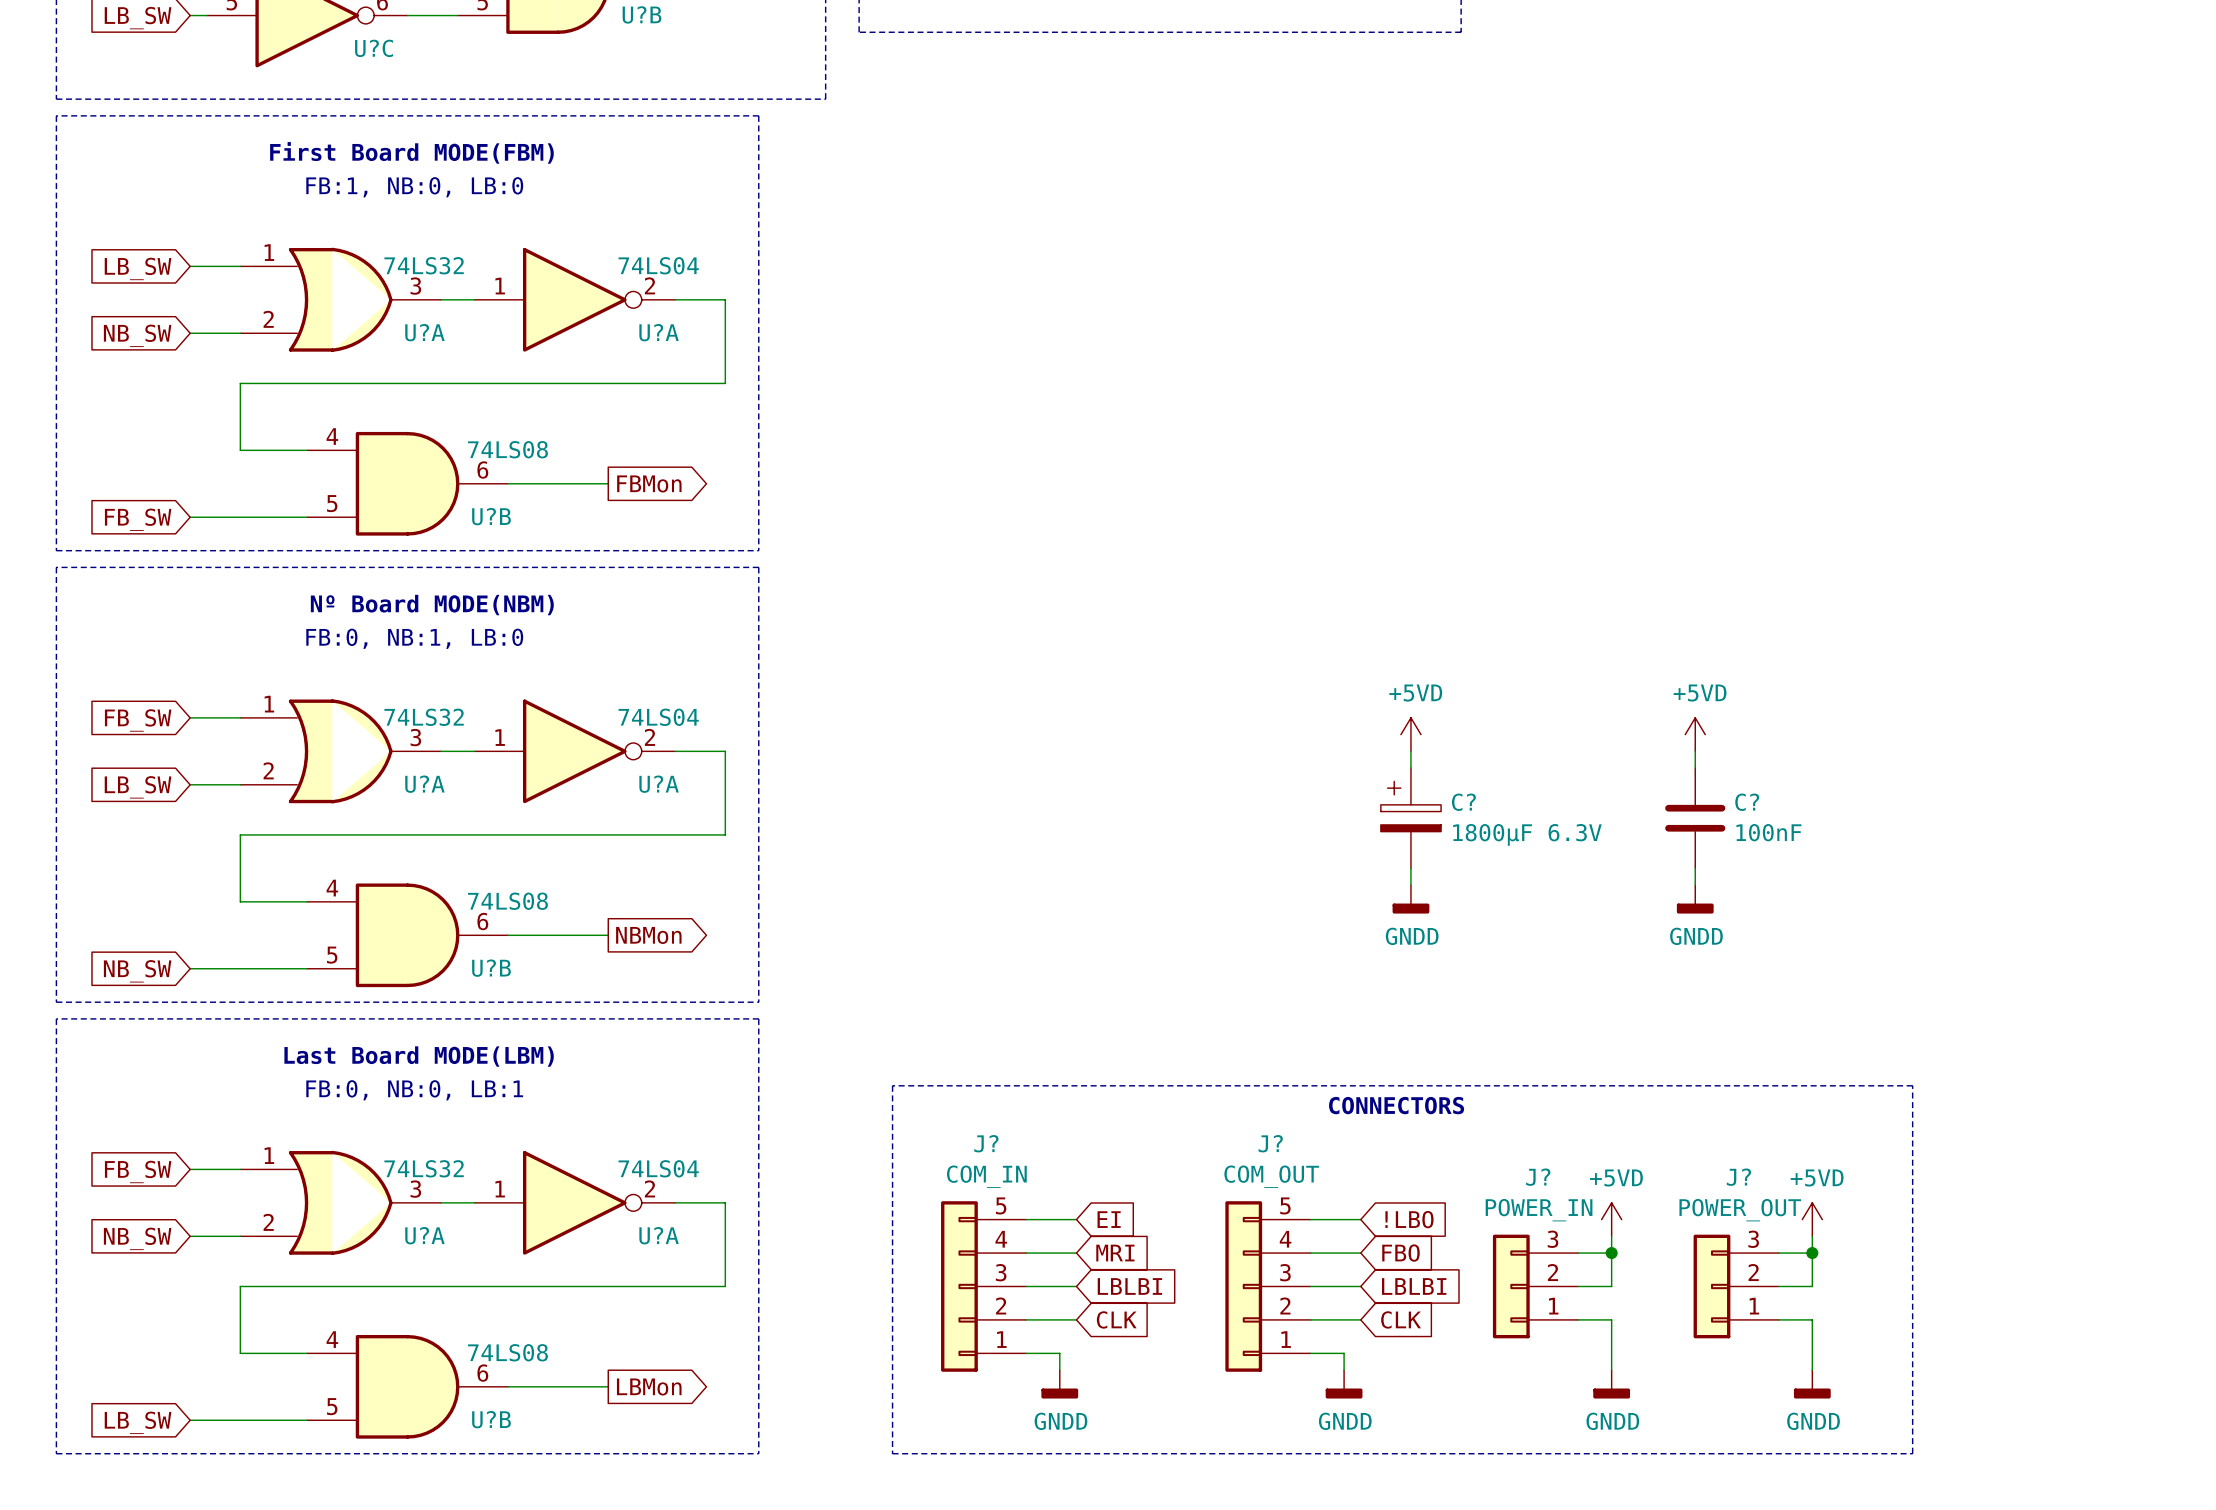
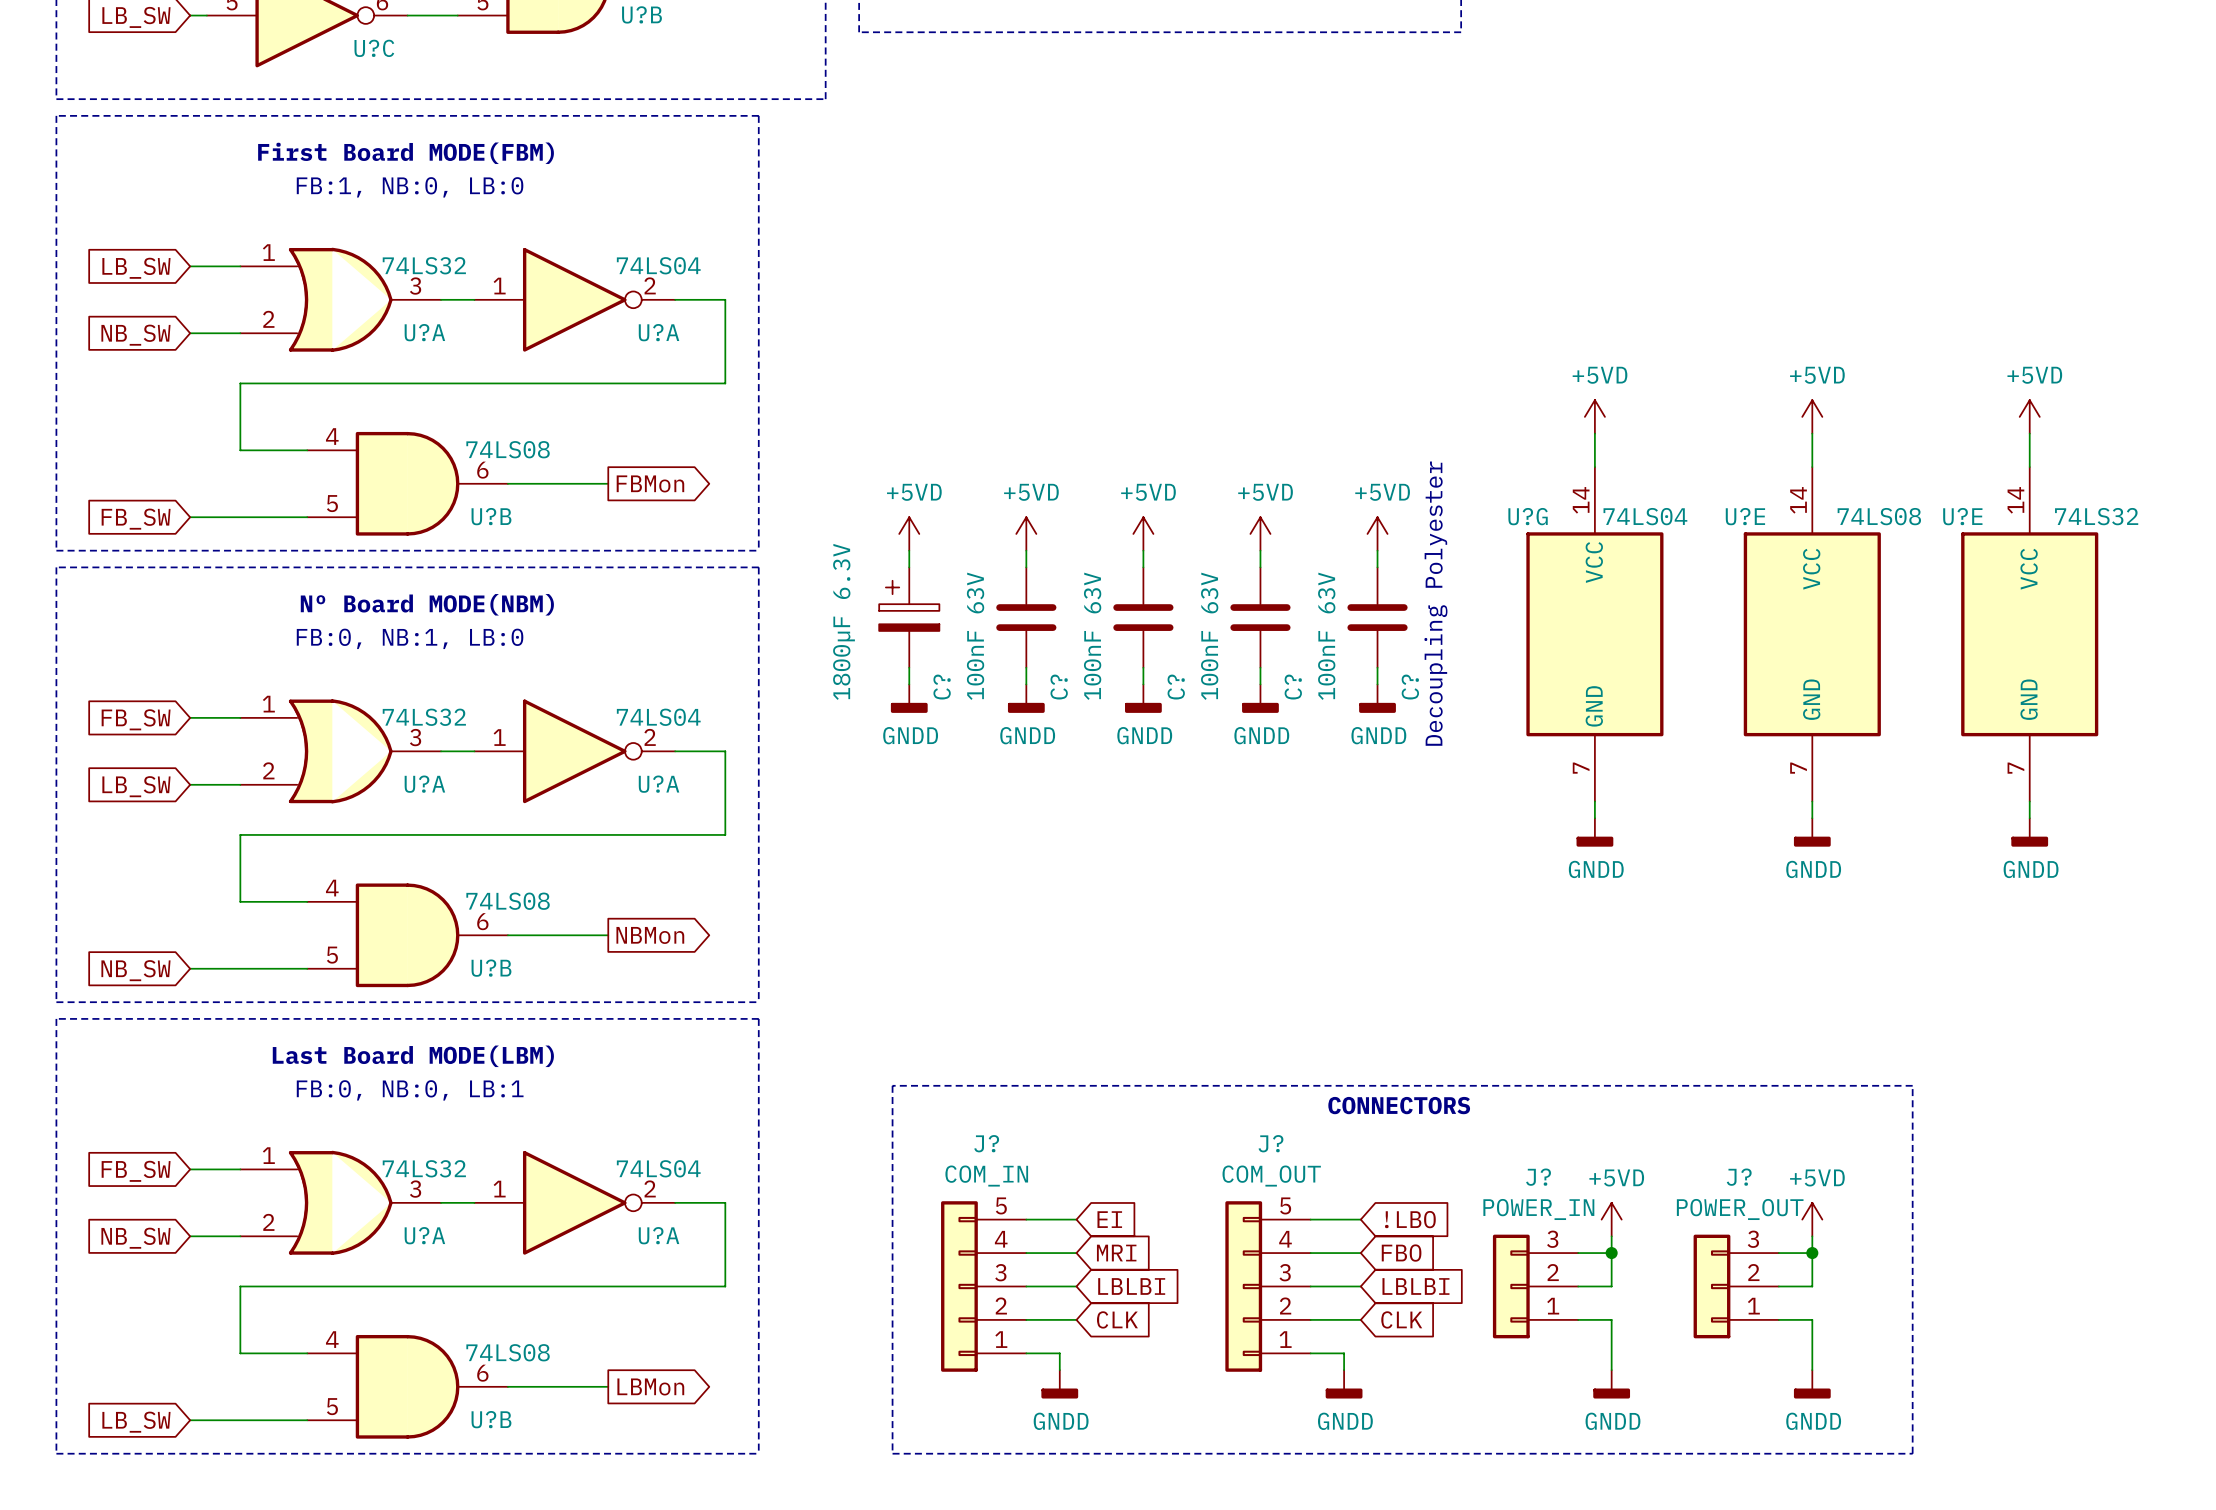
power symbol: none -> +5VD (1594, 416)
power symbol: none -> +5VD (1812, 416)
power symbol: none -> +5VD (2029, 416)
wire: none -> (1594, 433) (1594, 467)
wire: none -> (1812, 433) (1812, 467)
wire: none -> (2029, 433) (2029, 467)
power symbol: none -> +5VD (909, 533)
power symbol: none -> +5VD (1026, 533)
power symbol: none -> +5VD (1143, 533)
power symbol: none -> +5VD (1260, 533)
power symbol: none -> +5VD (1377, 533)
wire: none -> (909, 550) (909, 567)
wire: none -> (1026, 550) (1026, 567)
wire: none -> (1143, 550) (1143, 567)
wire: none -> (1260, 550) (1260, 567)
text: none -> Decoupling Polyester (1435, 603)
C?: none -> 1800µF 6.3V (909, 617)
C?: none -> 100nF 63V (1026, 617)
C?: none -> 100nF 63V (1143, 617)
C?: none -> 100nF 63V (1260, 617)
C?: none -> 100nF 63V (1377, 617)
U?G: none -> 74LS04 (1594, 634)
U?E: none -> 74LS08 (1812, 634)
U?E: none -> 74LS32 (2029, 634)
wire: none -> (909, 667) (909, 684)
wire: none -> (1026, 667) (1026, 684)
wire: none -> (1143, 667) (1143, 684)
wire: none -> (1260, 667) (1260, 684)
power symbol: none -> GNDD (909, 698)
power symbol: none -> GNDD (1026, 698)
power symbol: none -> GNDD (1143, 698)
power symbol: none -> GNDD (1260, 698)
power symbol: none -> GNDD (1377, 698)
power symbol: +5VD (1410, 734) -> none
power symbol: +5VD (1695, 734) -> none
wire: (1410, 751) (1410, 768) -> (1377, 550) (1377, 567)
wire: (1695, 751) (1695, 768) -> (1594, 801) (1594, 818)
wire: none -> (2029, 801) (2029, 818)
C?: 1800µF 6.3V (1410, 818) -> none
C?: 100nF (1695, 818) -> none
power symbol: none -> GNDD (1594, 832)
power symbol: none -> GNDD (1812, 832)
power symbol: none -> GNDD (2029, 832)
wire: (1410, 868) (1410, 885) -> (1377, 667) (1377, 684)
wire: (1695, 868) (1695, 885) -> (1812, 801) (1812, 818)
power symbol: GNDD (1410, 899) -> none
power symbol: GNDD (1695, 899) -> none

